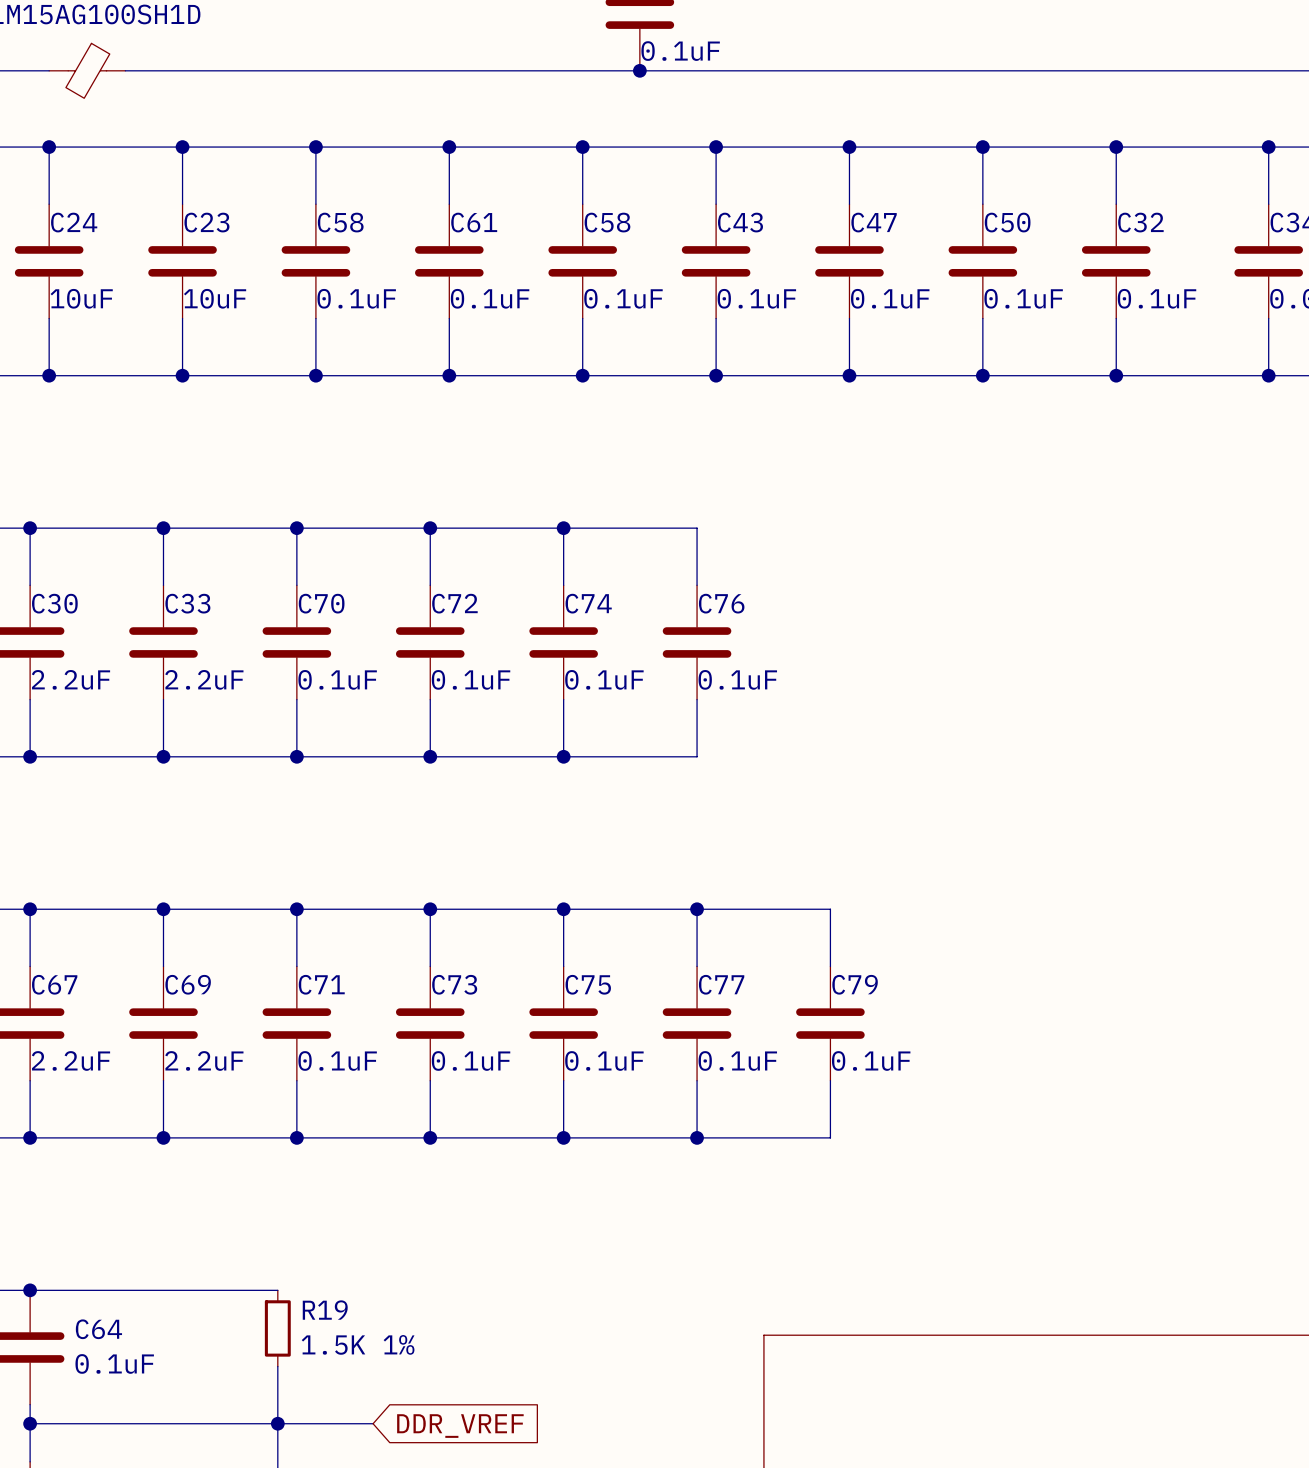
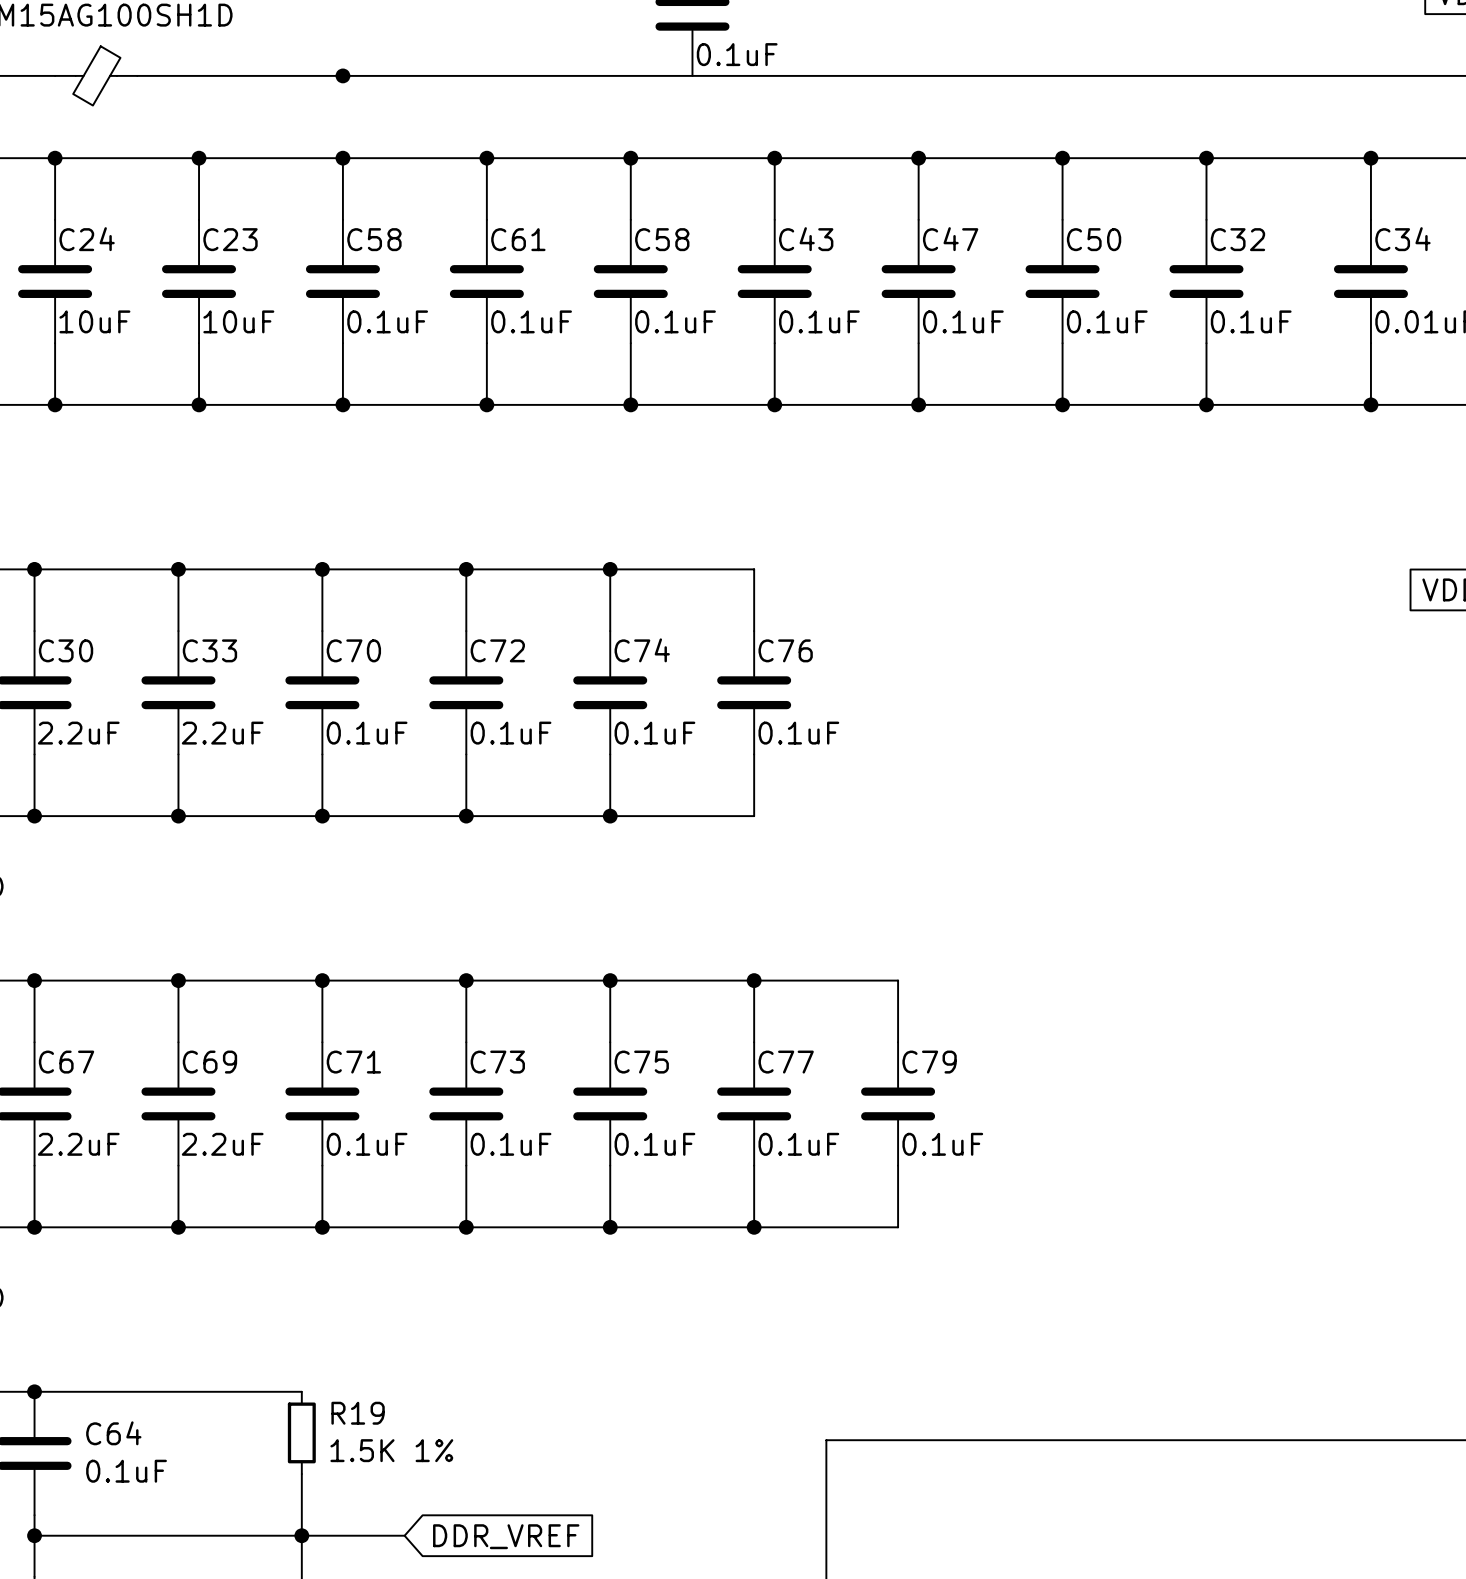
junction: none -> (342, 75)
junction: (639, 70) -> none

